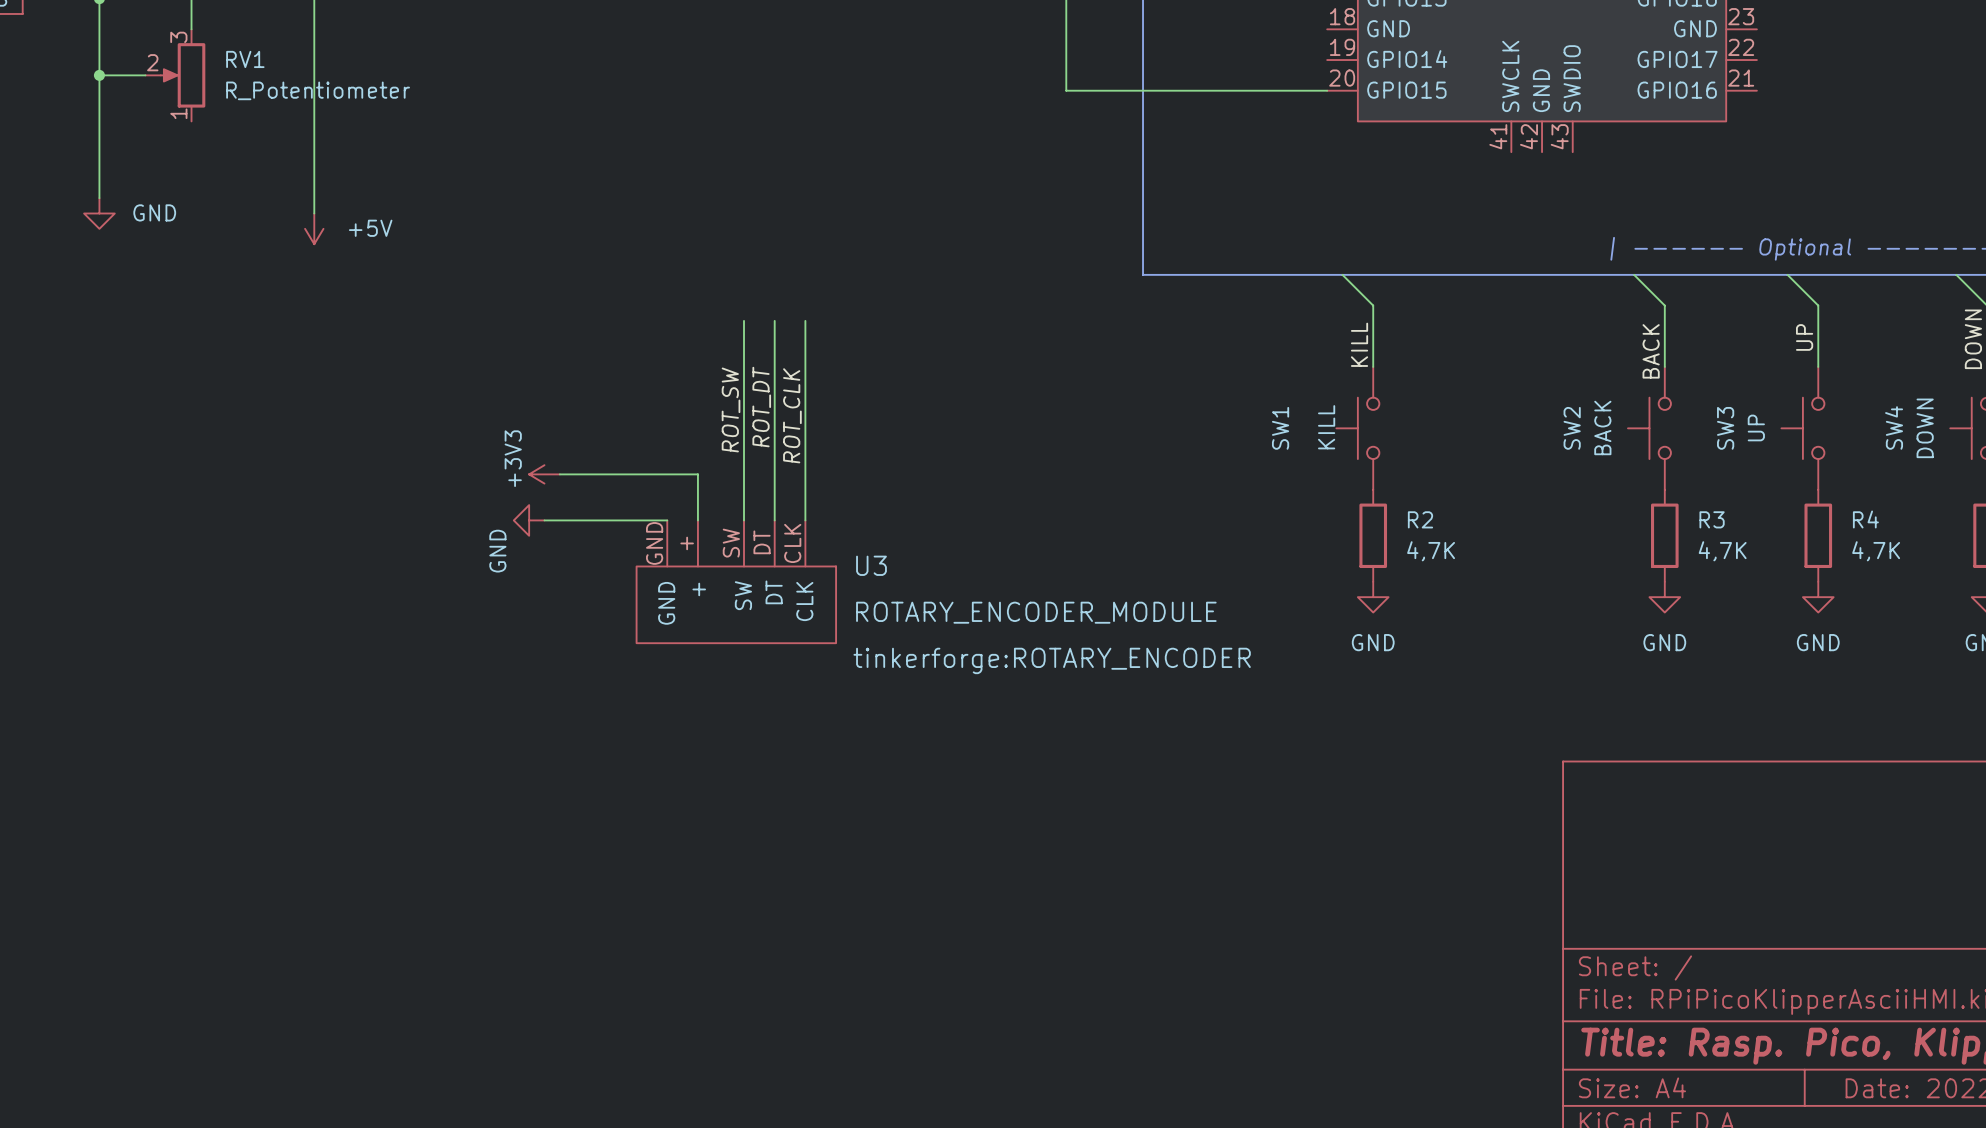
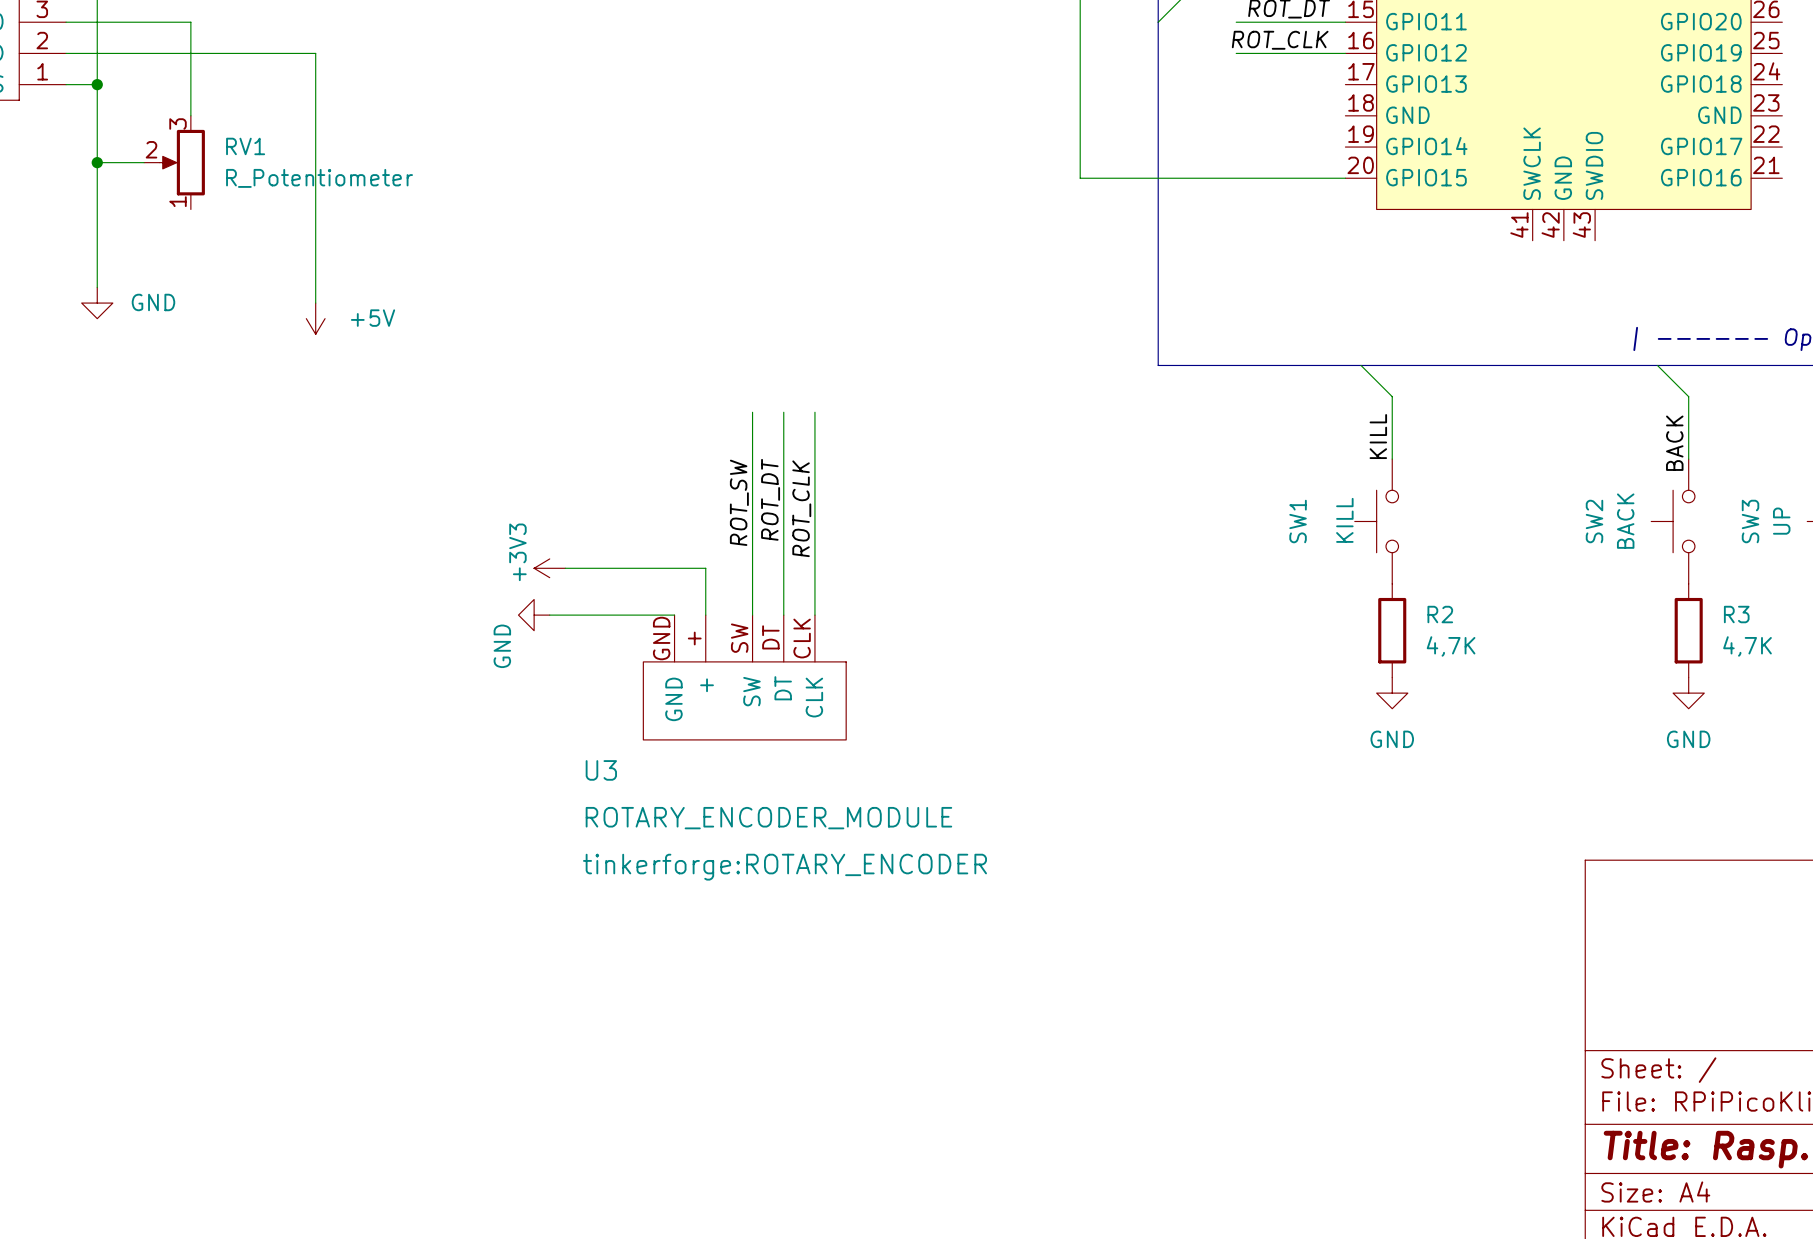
U3 name position: U3 (871, 565) -> U3 (601, 770)
U3 value position: ROTARY_ENCODER_MODULE (1036, 612) -> ROTARY_ENCODER_MODULE (768, 818)
U3 text position: tinkerforge:ROTARY_ENCODER (1052, 660) -> tinkerforge:ROTARY_ENCODER (784, 867)

